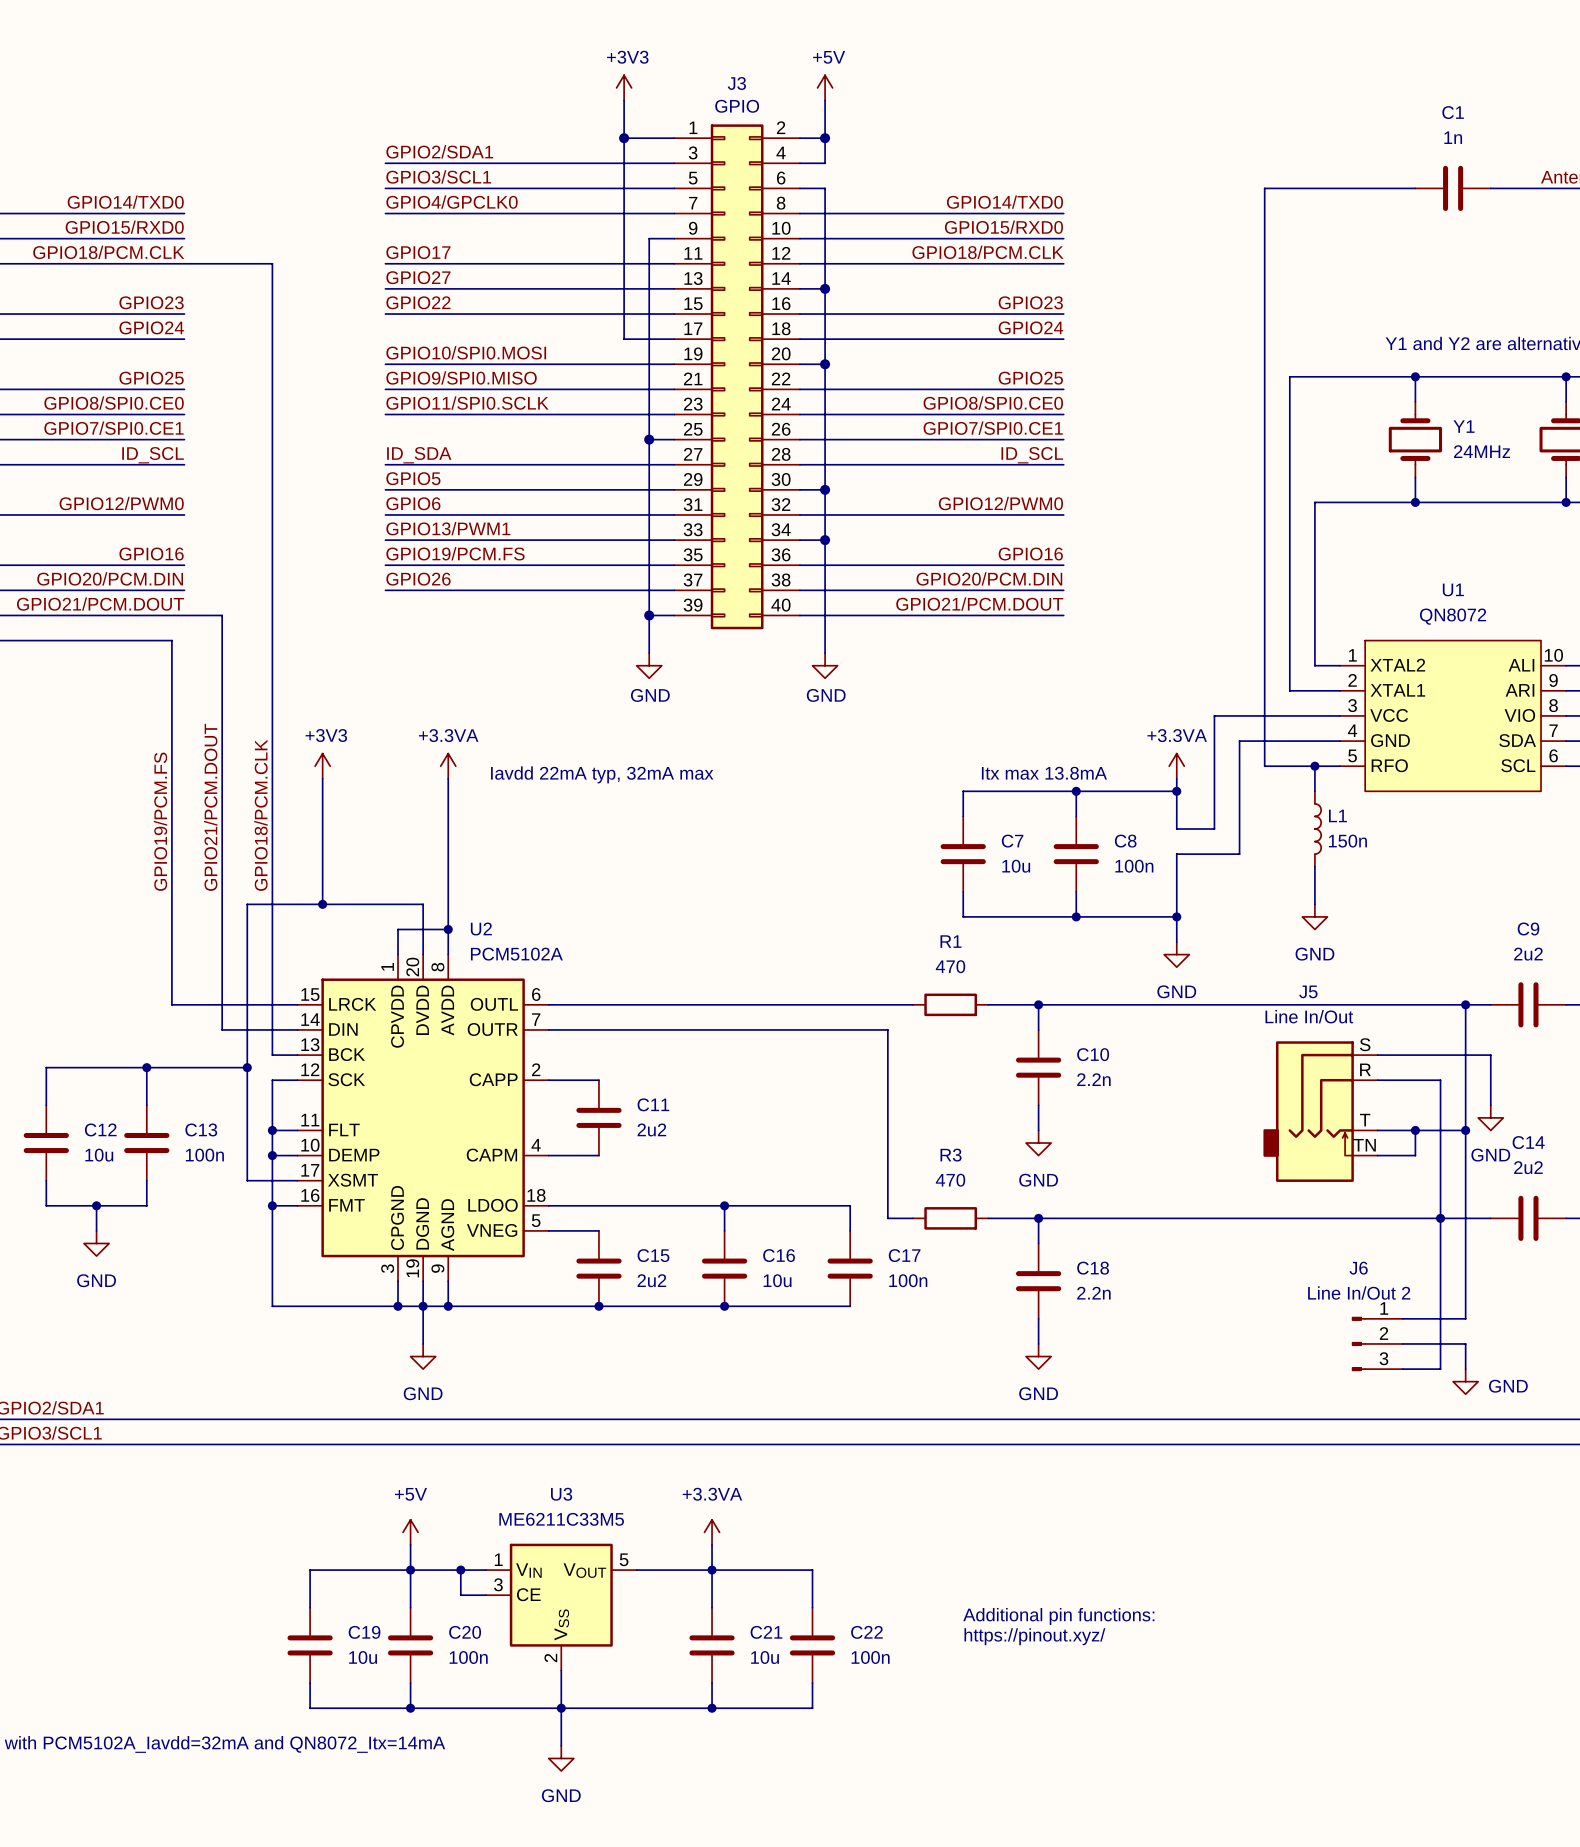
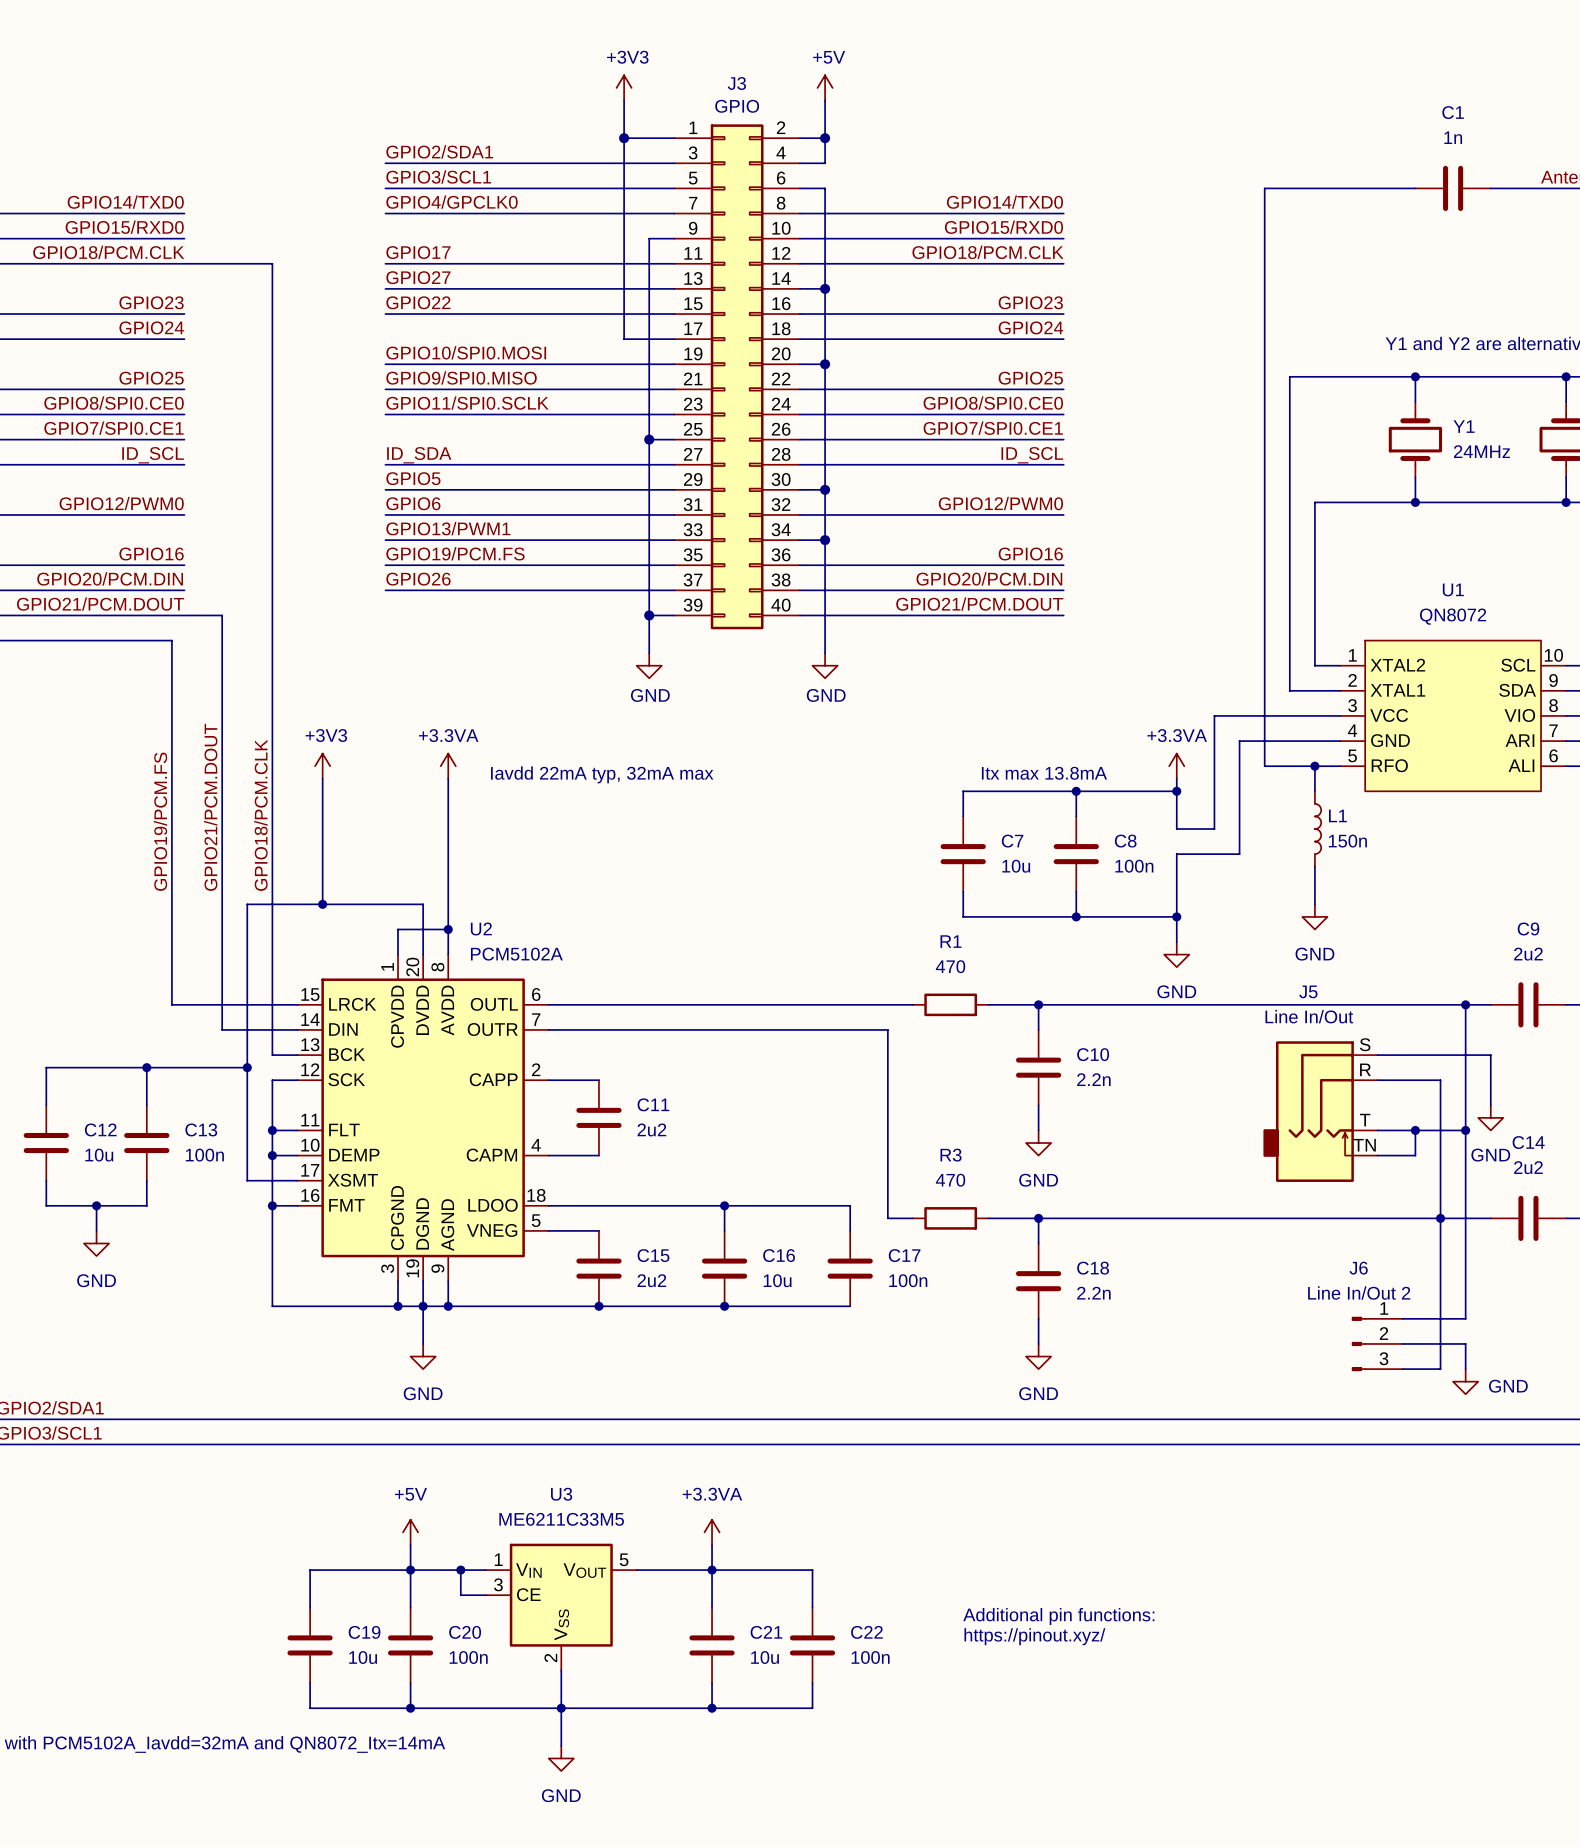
U1 pin name: ALI (1521, 665) -> SCL (1518, 665)
U1 pin name: ARI (1519, 690) -> SDA (1517, 690)
U1 pin name: SDA (1517, 740) -> ARI (1519, 740)
U1 pin name: SCL (1518, 765) -> ALI (1521, 765)

